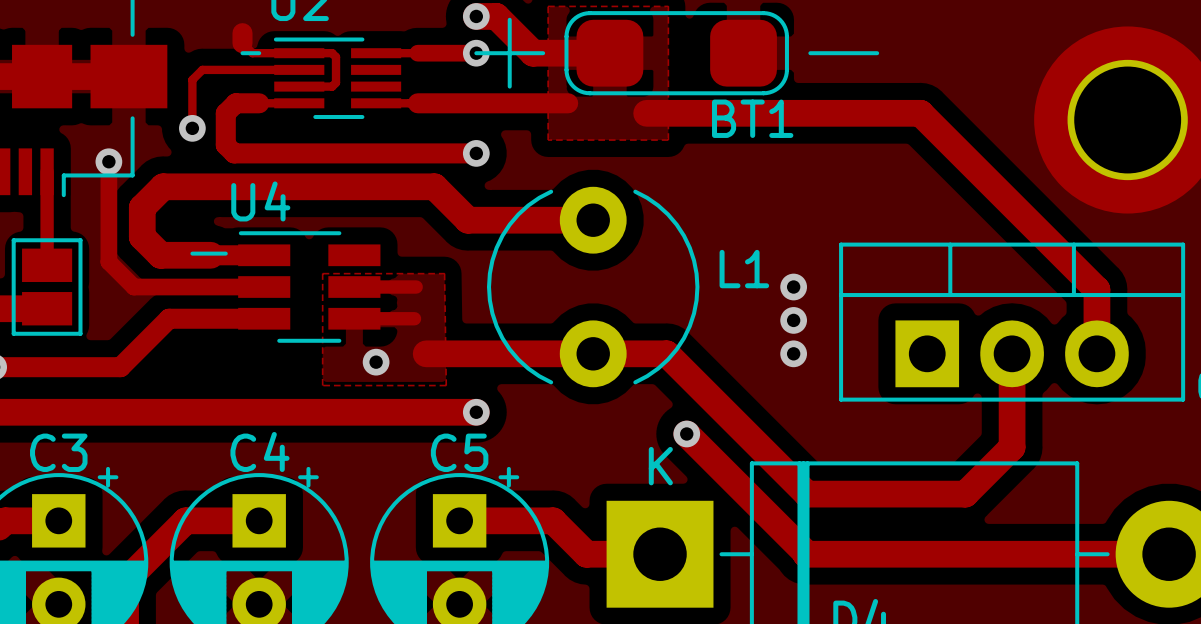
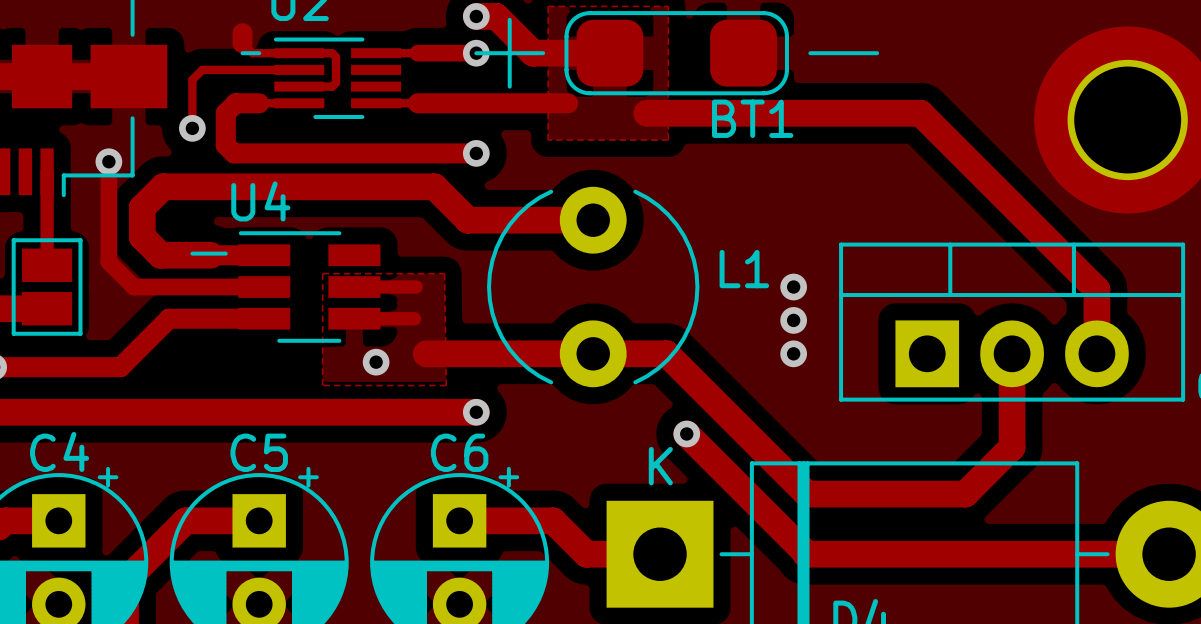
C4 name: C4 (259, 451) -> C5 (259, 452)
C3 name: C3 (58, 452) -> C4 (59, 451)
C5 name: C5 (459, 452) -> C6 (459, 452)

